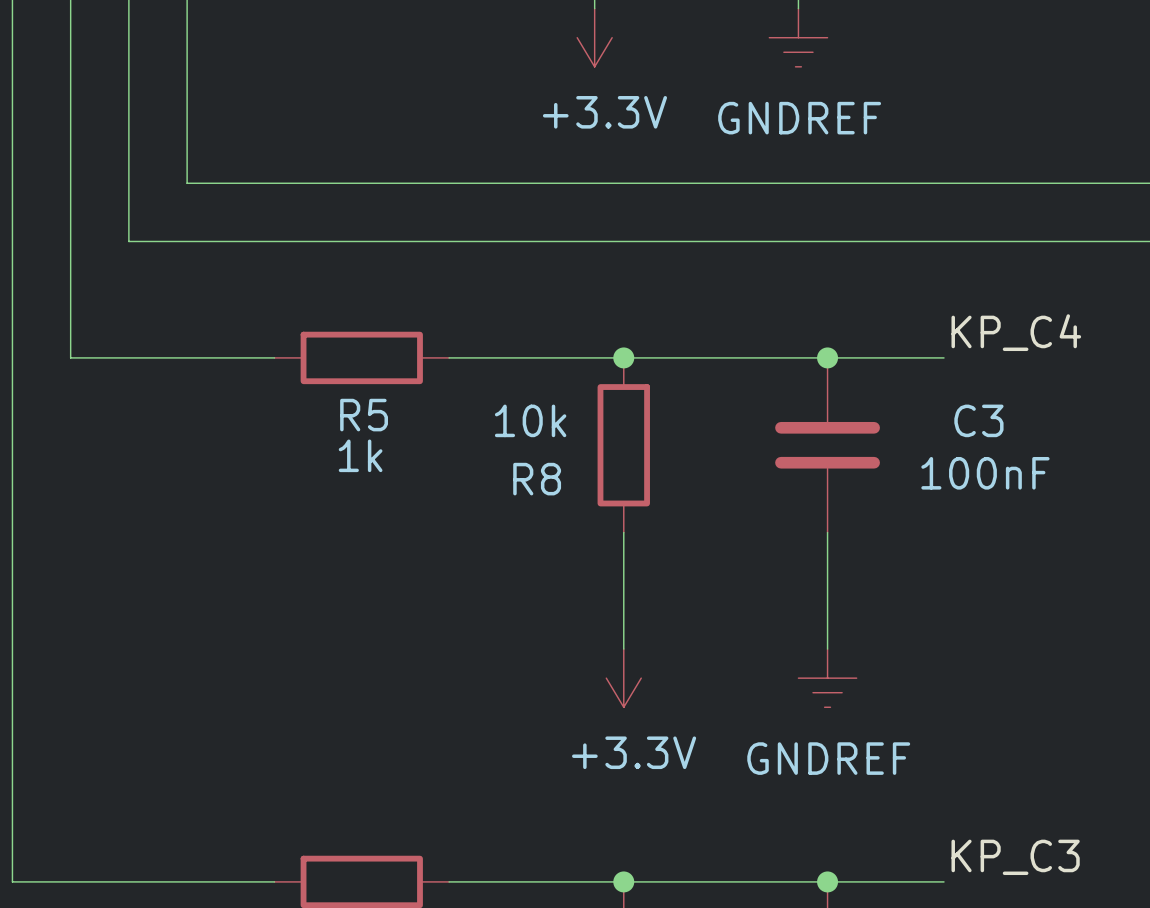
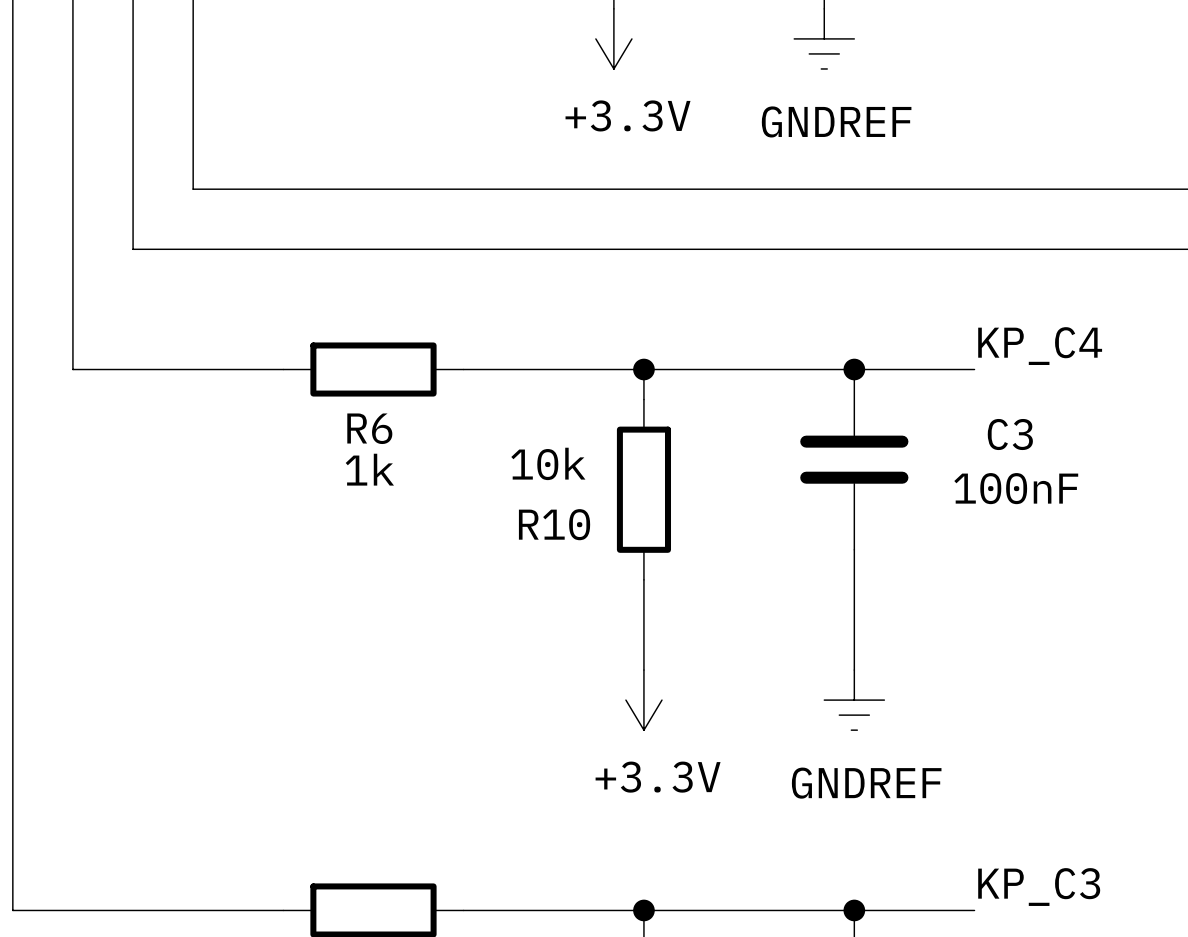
R5 name: R5 (364, 415) -> R6 (369, 428)
R8: 10k (623, 445) -> none
R10: none -> 10k (643, 489)

